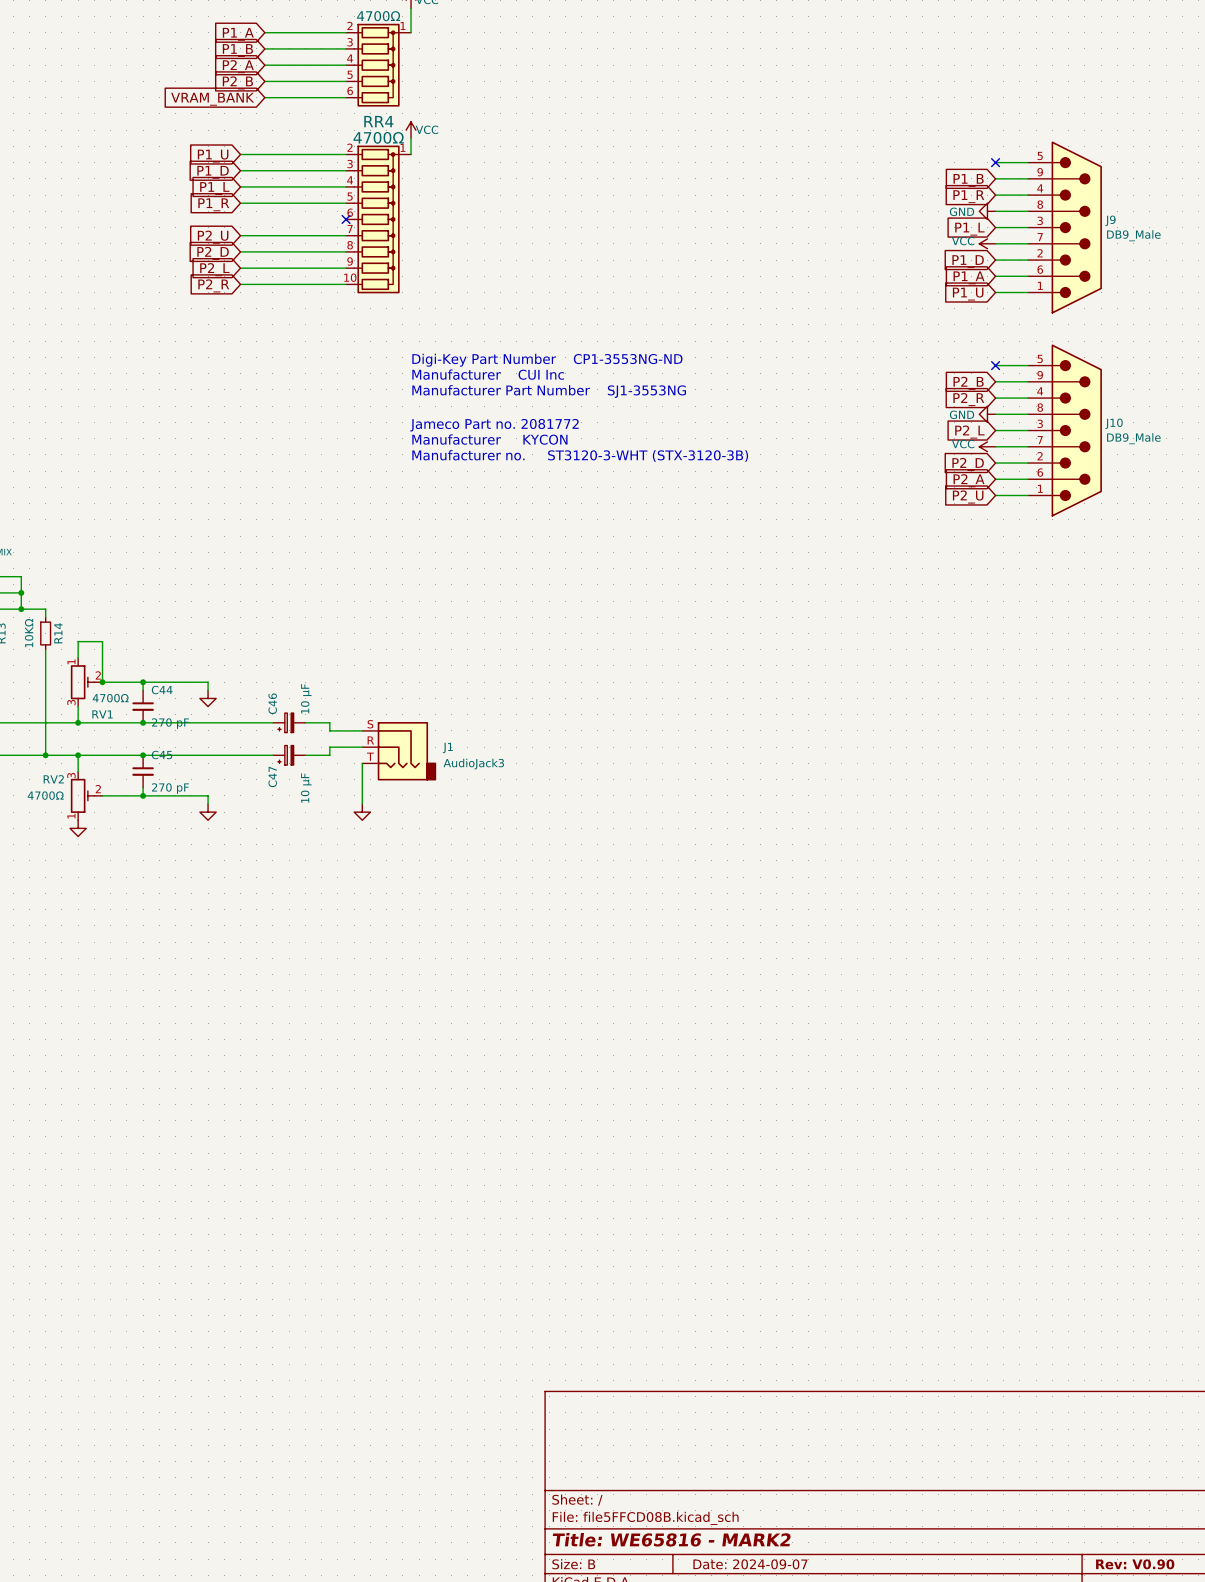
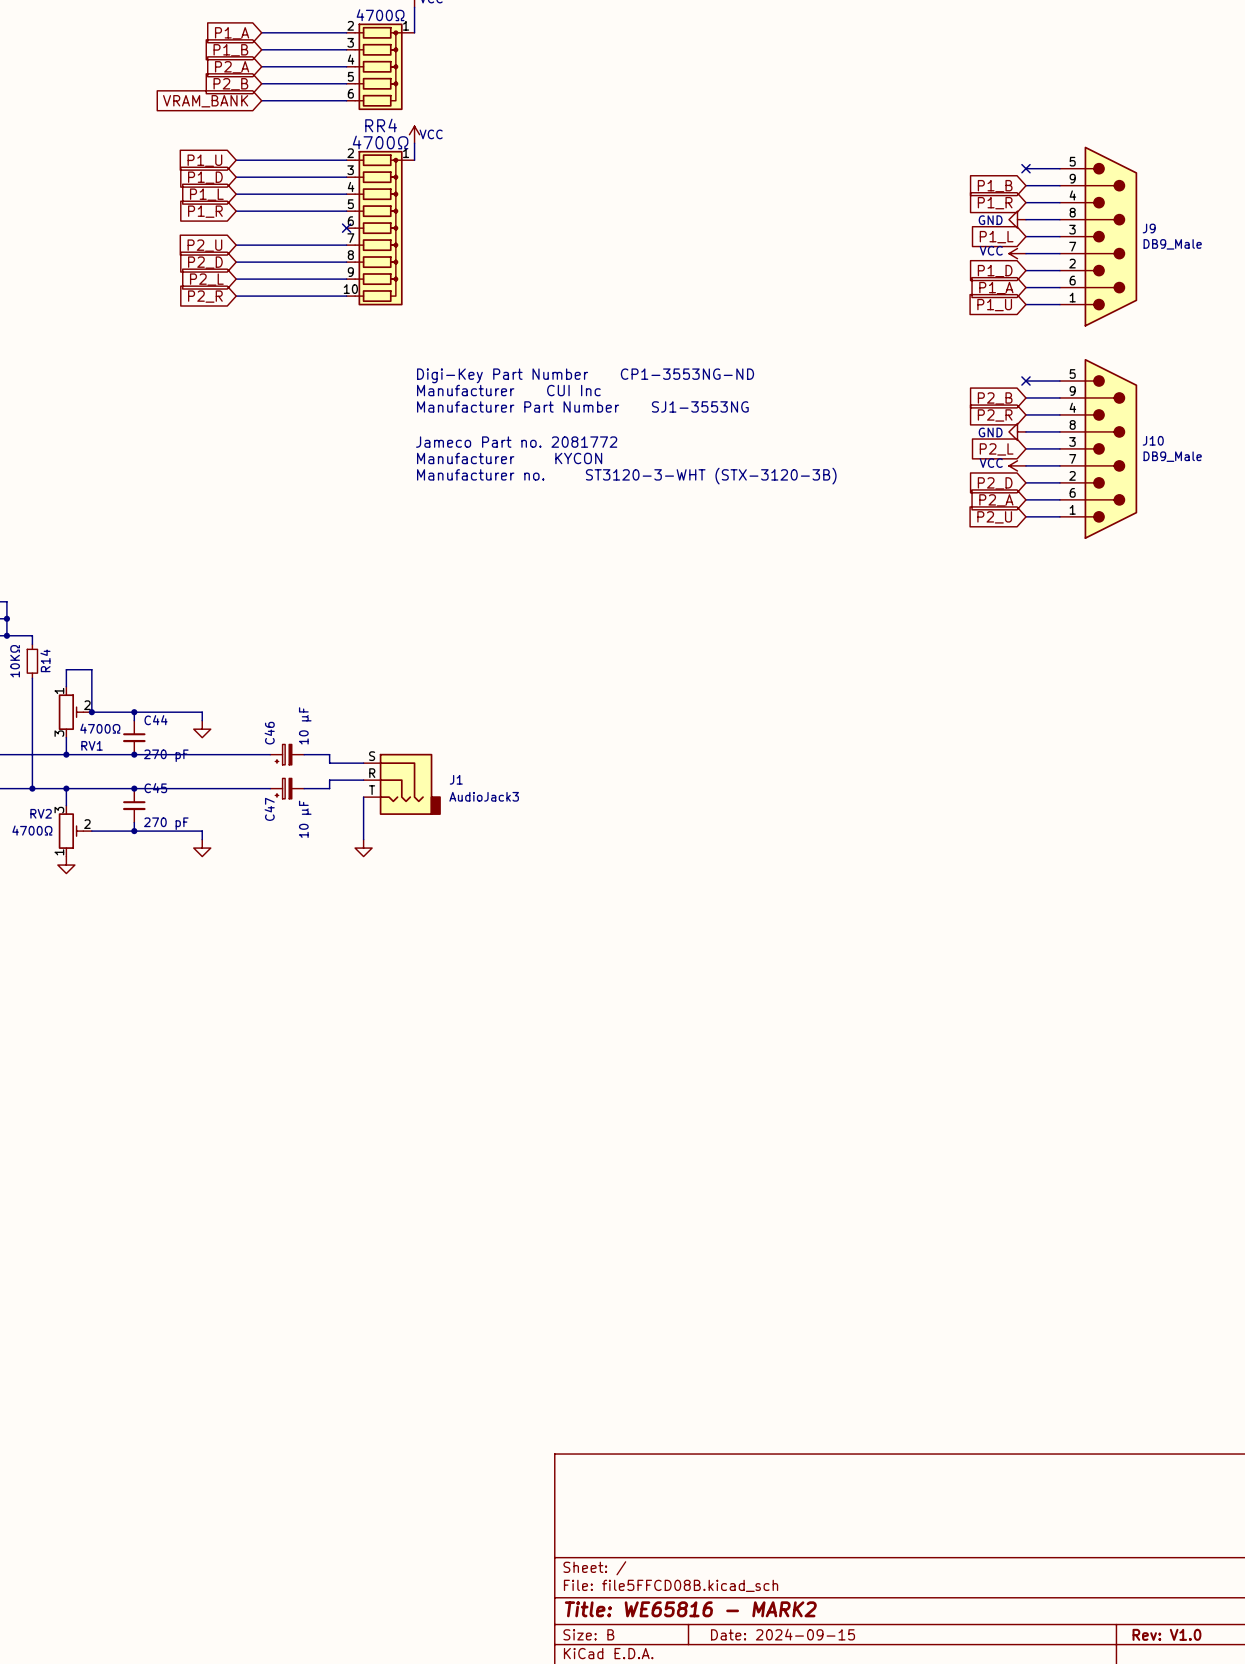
title block: Date: 2024-09-07 (750, 1564) -> Date: 2024-09-15 (783, 1634)
title block: Rev: V0.90 (1135, 1564) -> Rev: V1.0 (1166, 1634)

